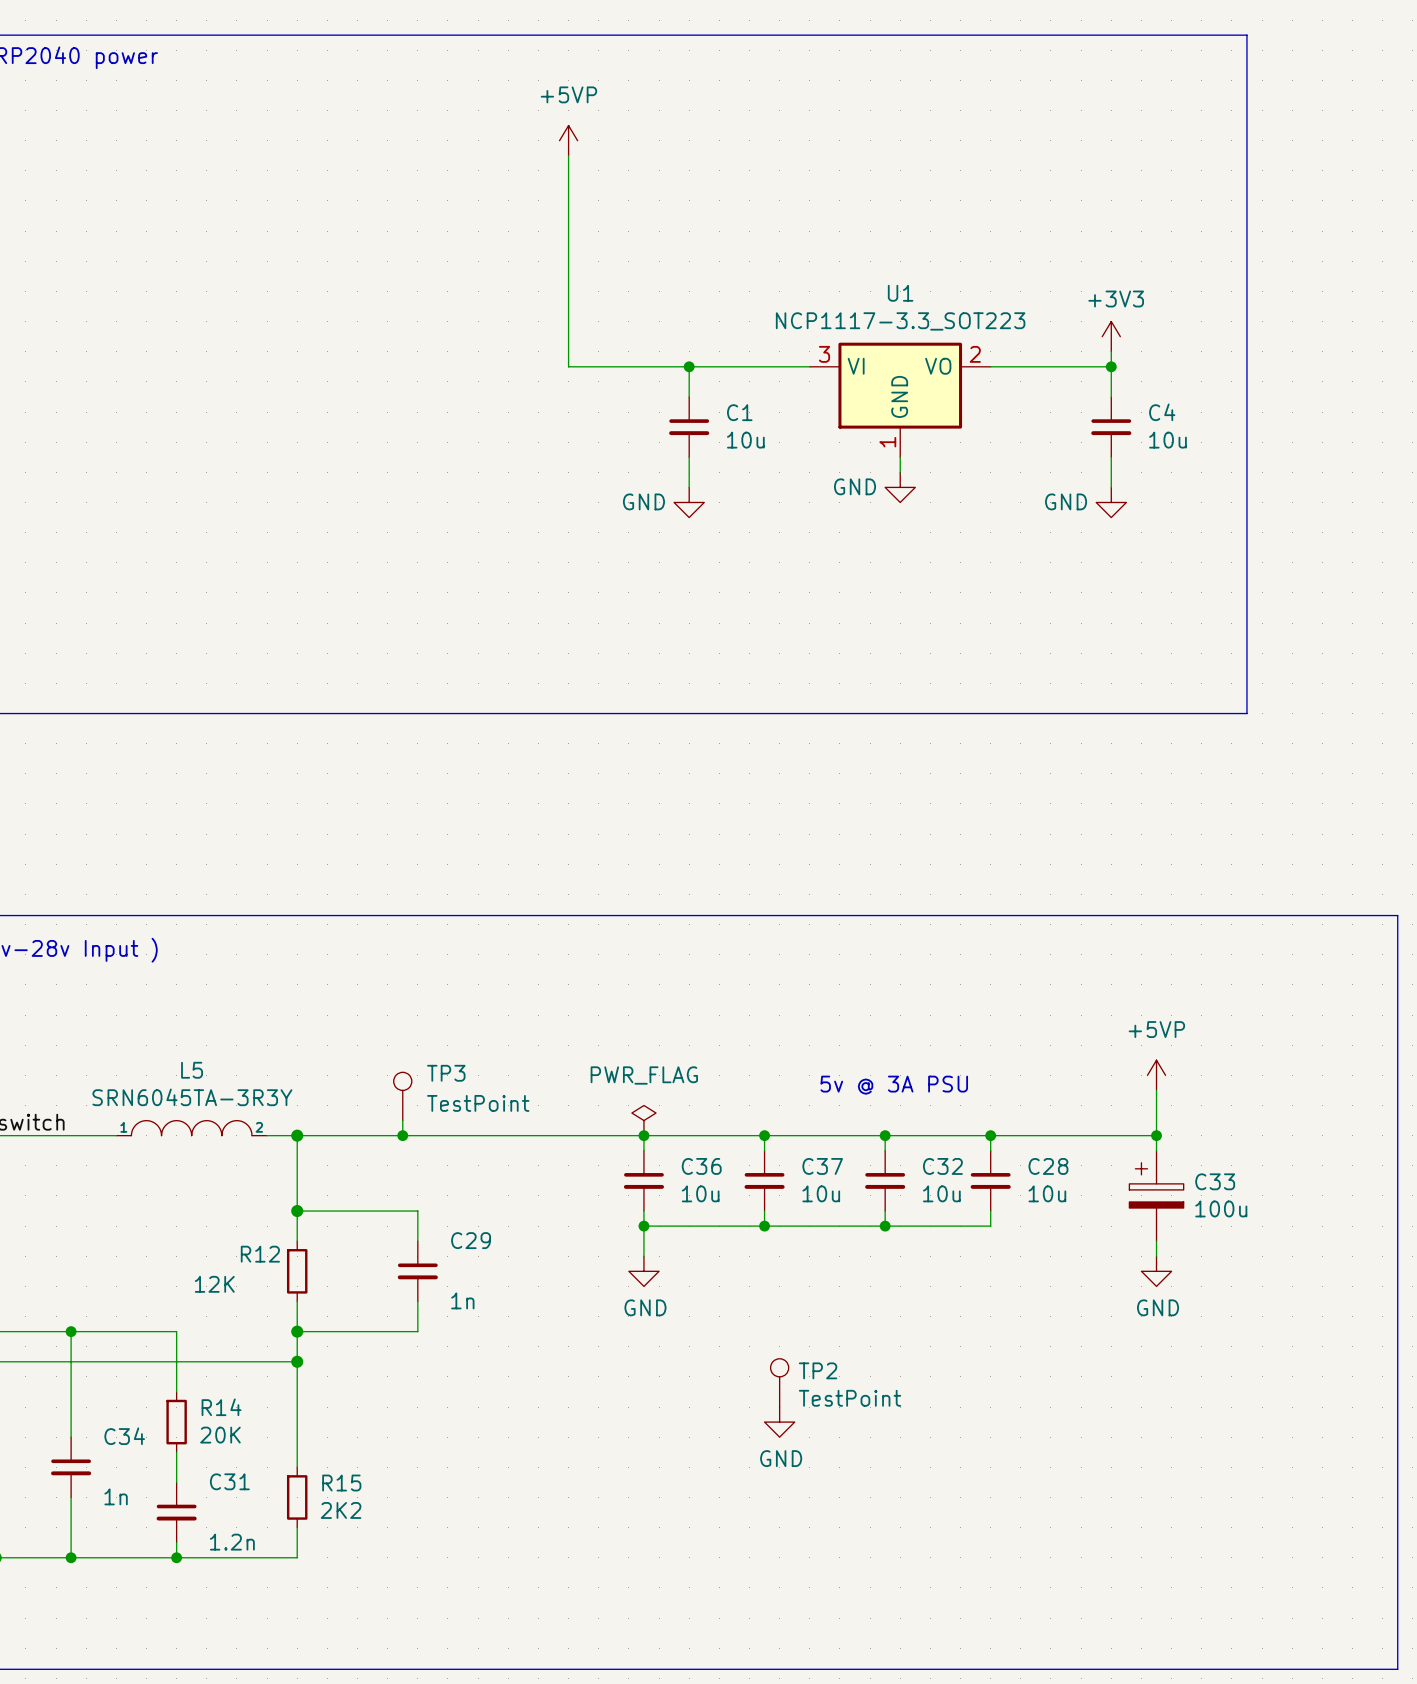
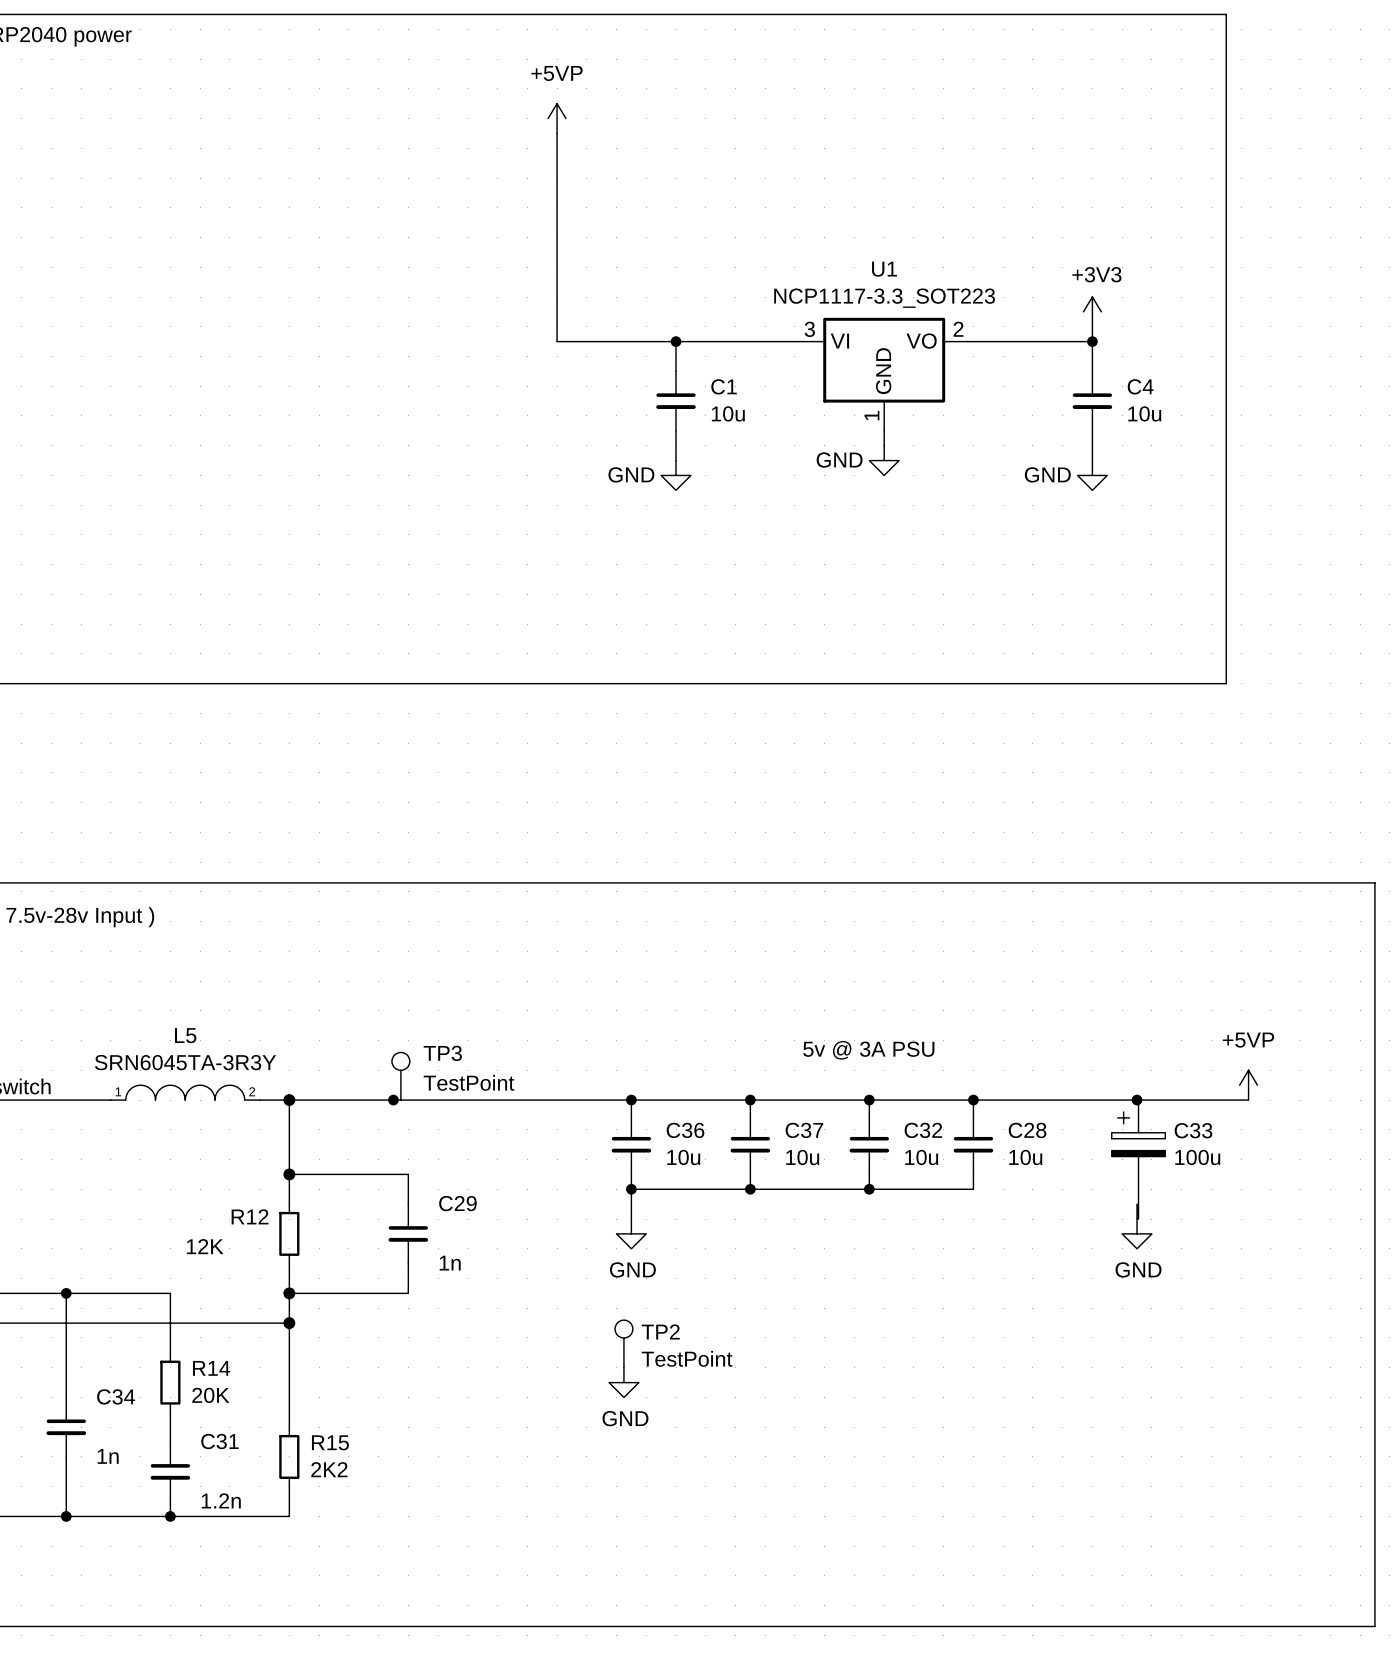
power symbol position: +5VP (1156, 1075) -> +5VP (1248, 1085)
wire: (1156, 1090) (1156, 1150) -> none
TP3 position: (402, 1096) -> (400, 1076)
wire: (402, 1120) (402, 1135) -> none
power symbol: PWR_FLAG (643, 1120) -> none
wire: none -> (1137, 1100) (1248, 1100)
C33 position: (1156, 1195) -> (1138, 1144)
wire: none -> (1138, 1189) (1138, 1219)
TP2 position: (779, 1382) -> (623, 1343)
power symbol position: GND (779, 1422) -> GND (623, 1382)

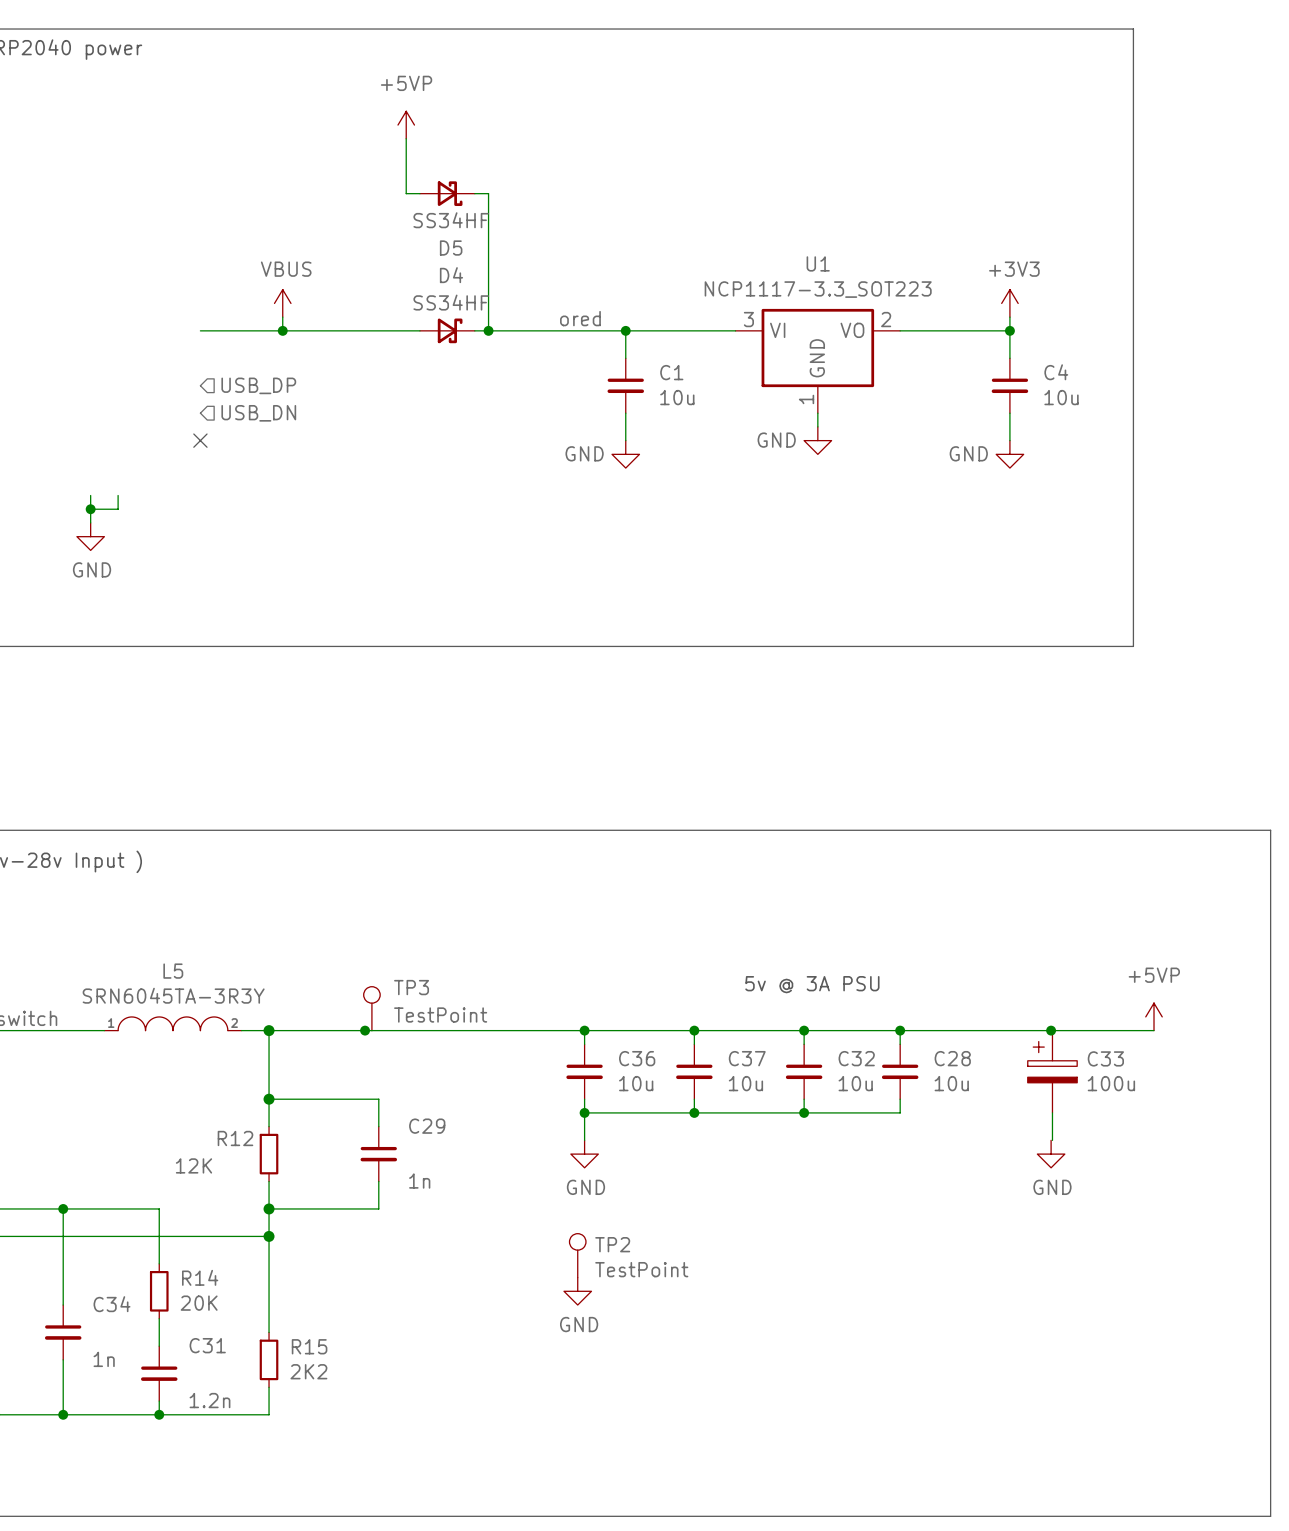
power symbol position: +5VP (557, 118) -> +5VP (406, 125)
wire: none -> (406, 138) (406, 193) (419, 193)
wire: (557, 133) (557, 341) -> (474, 330) (515, 330)
D5: none -> SS34HF (447, 193)
wire: none -> (474, 193) (488, 193) (488, 330)
power symbol: none -> VBUS (282, 303)
wire: none -> (282, 317) (282, 330)
label: none -> ored (580, 318)
wire: none -> (200, 330) (419, 330)
junction: none -> (282, 330)
D4: none -> SS34HF (447, 330)
junction: none -> (488, 330)
hierarchical label: none -> USB_DP (258, 385)
hierarchical label: none -> USB_DN (258, 413)
no-connect mark: none -> (200, 440)
wire: none -> (90, 495) (90, 522)
wire: none -> (118, 495) (118, 509) (90, 509)
junction: none -> (90, 509)
power symbol: none -> GND (90, 536)
wire: (1137, 1204) (1137, 1219) -> none

